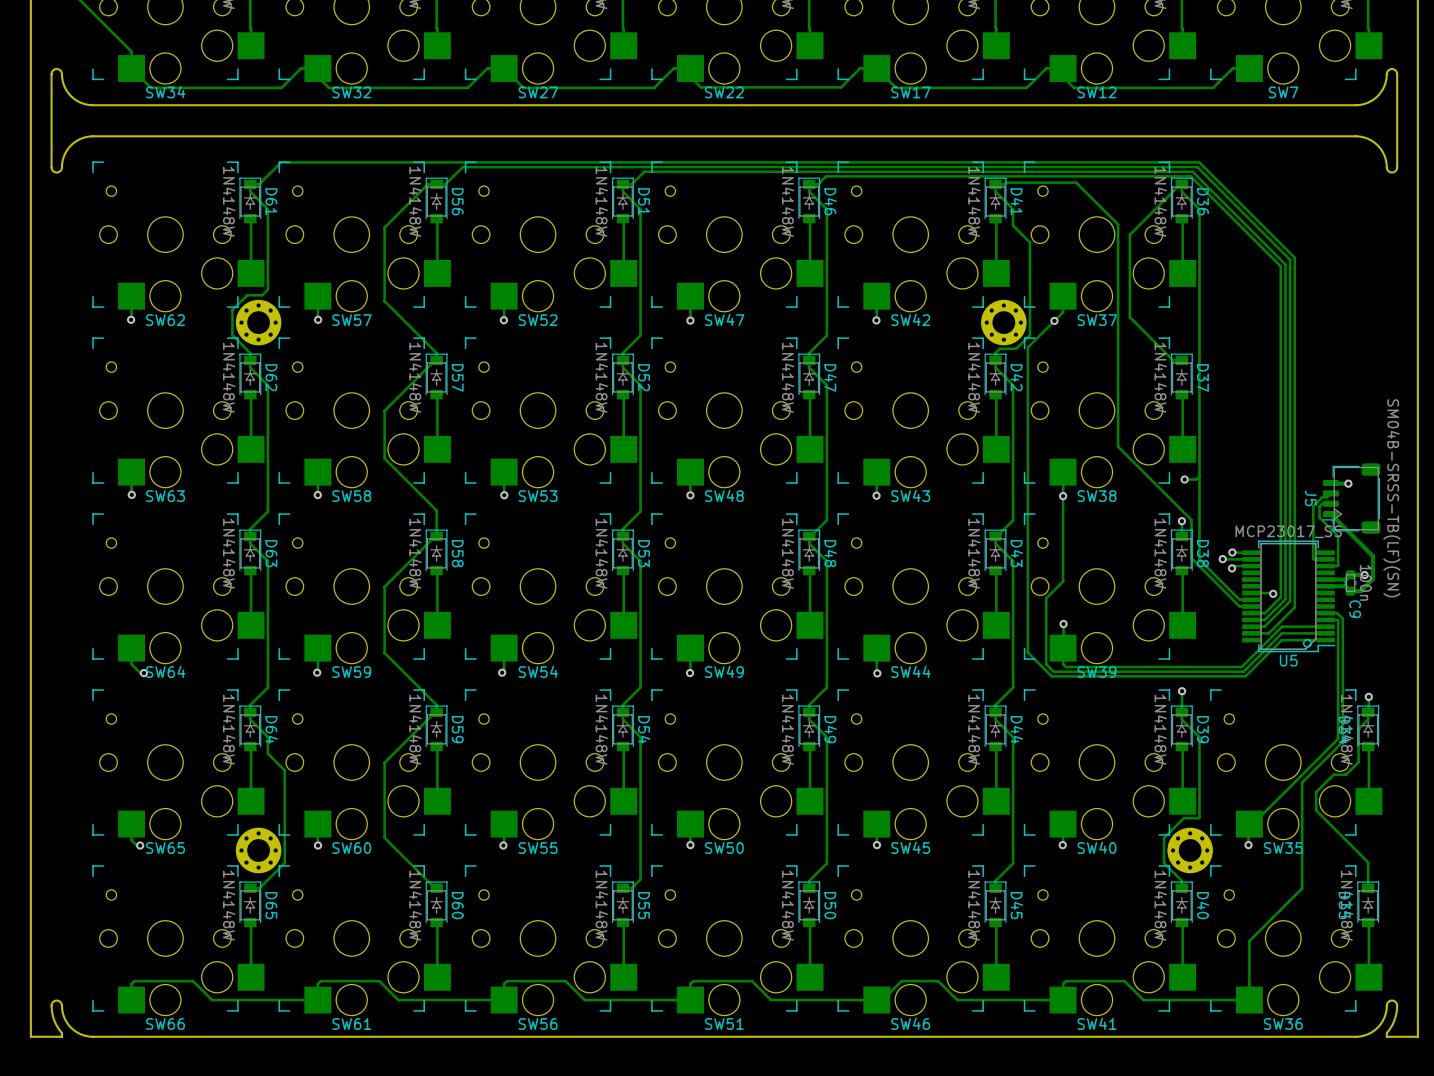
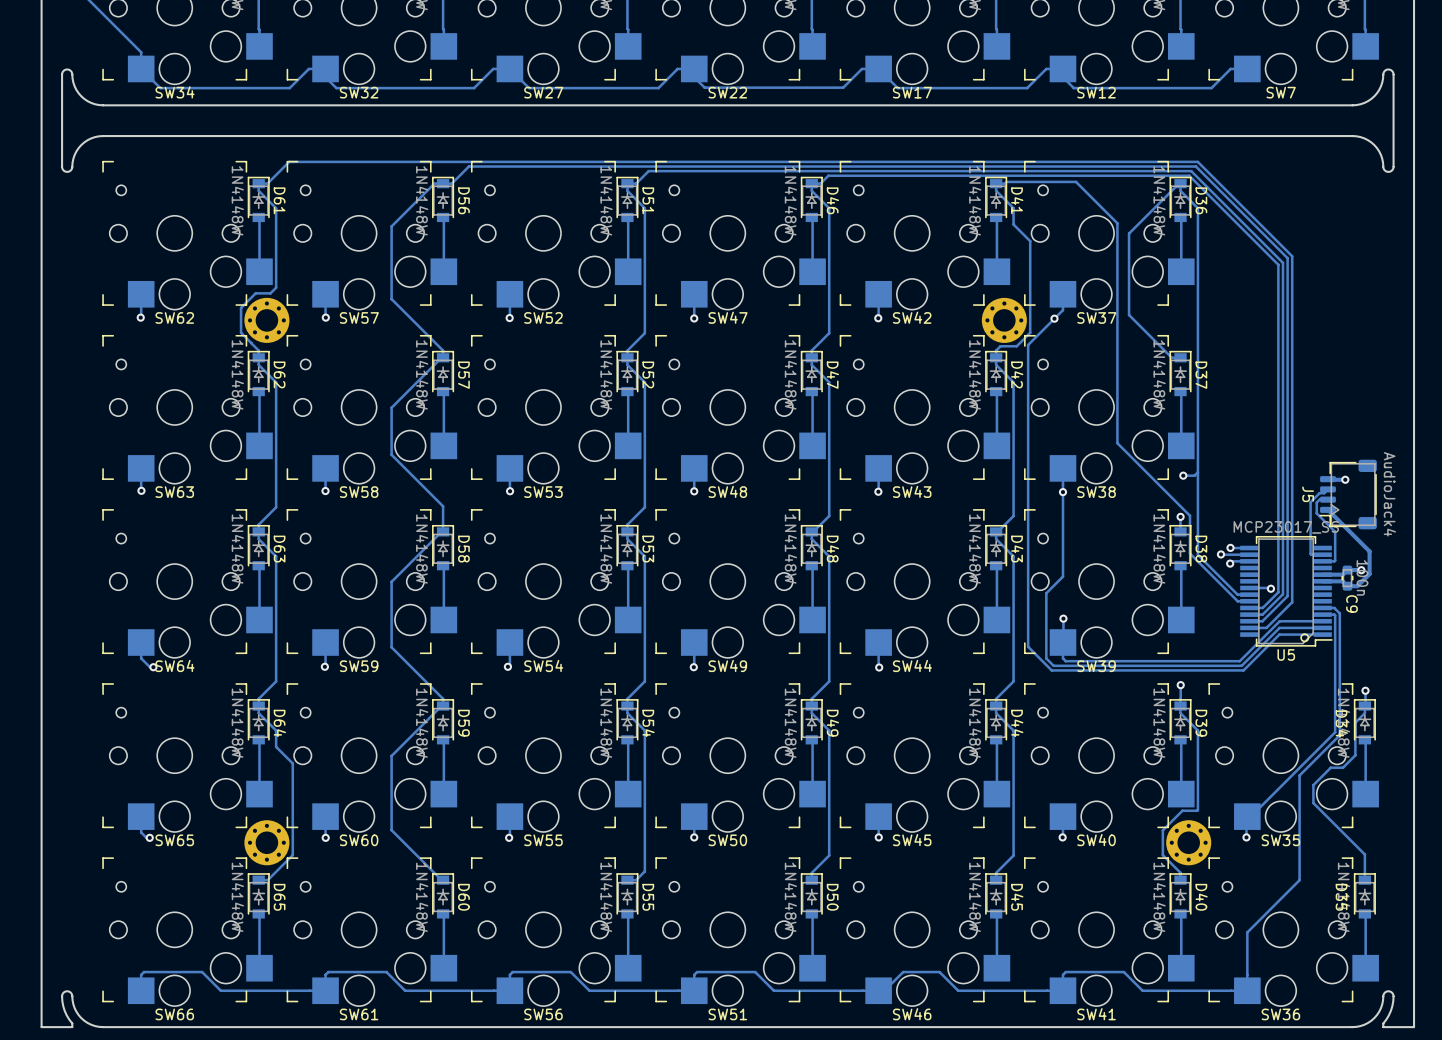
J5 value: SM04B-SRSS-TB(LF)(SN) (1391, 498) -> AudioJack4 (1389, 494)

